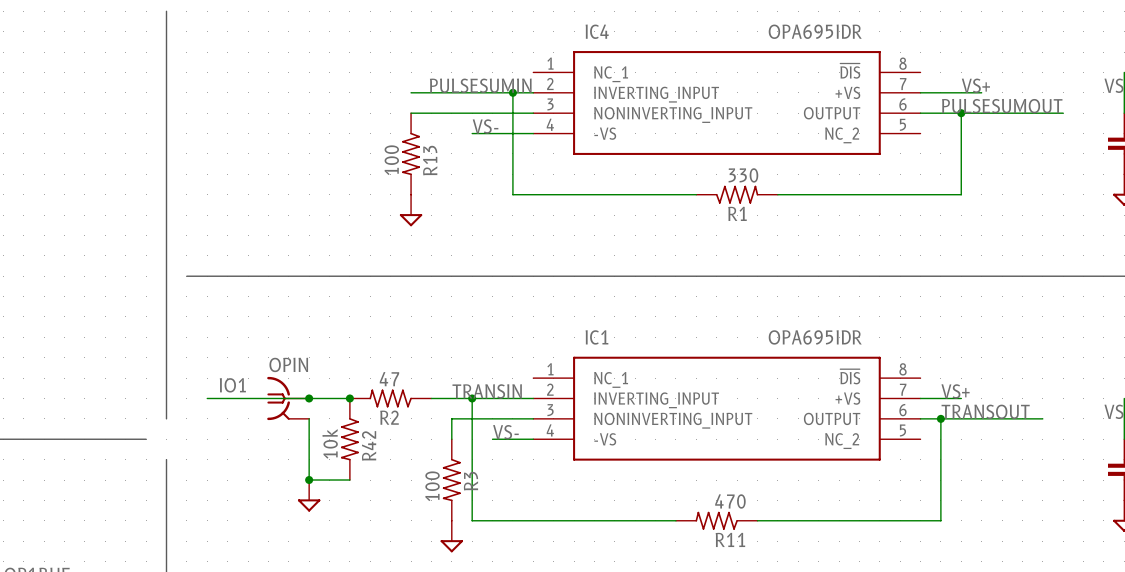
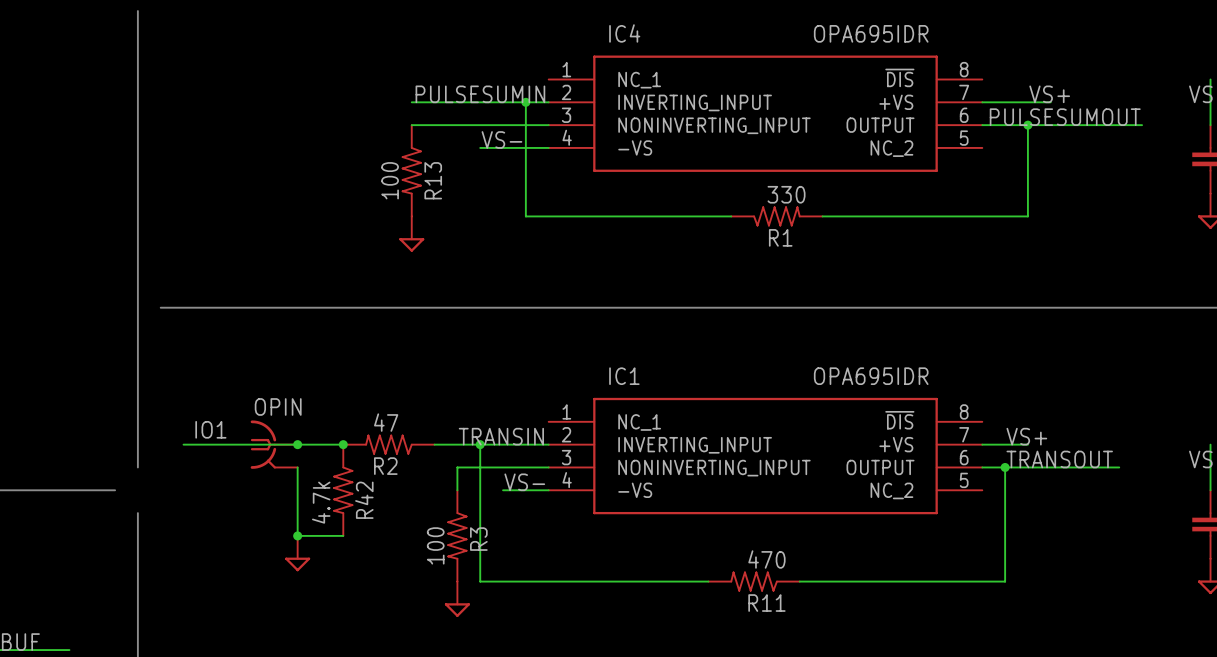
R42 value: 10k (330, 443) -> 4.7k (321, 502)

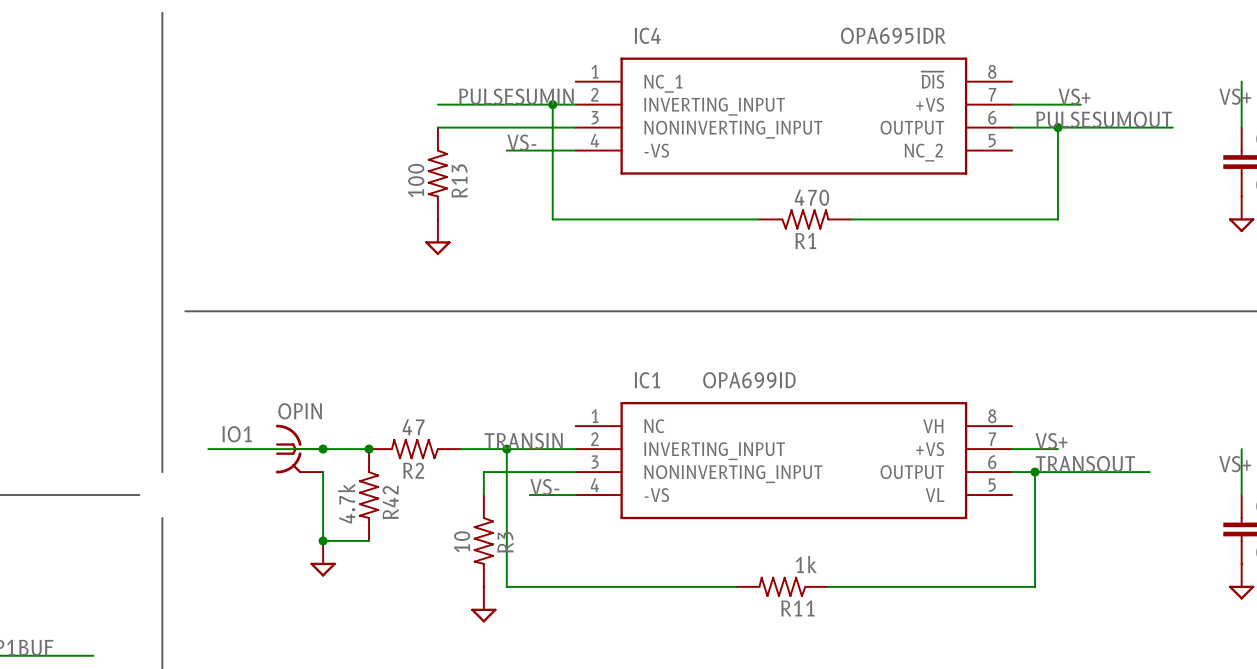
R1 value: 330 (786, 194) -> 470 (811, 197)
IC1 value: OPA695IDR (871, 376) -> OPA699ID (749, 380)
IC1 pin name: ~{DIS} (899, 420) -> VH (933, 426)
IC1 pin name: NC_1 (639, 422) -> NC (654, 426)
IC1 pin name: NC_2 (891, 490) -> VL (935, 495)
R3 value: 100 (435, 545) -> 10 (462, 541)
R11 value: 470 (766, 559) -> 1k (806, 564)

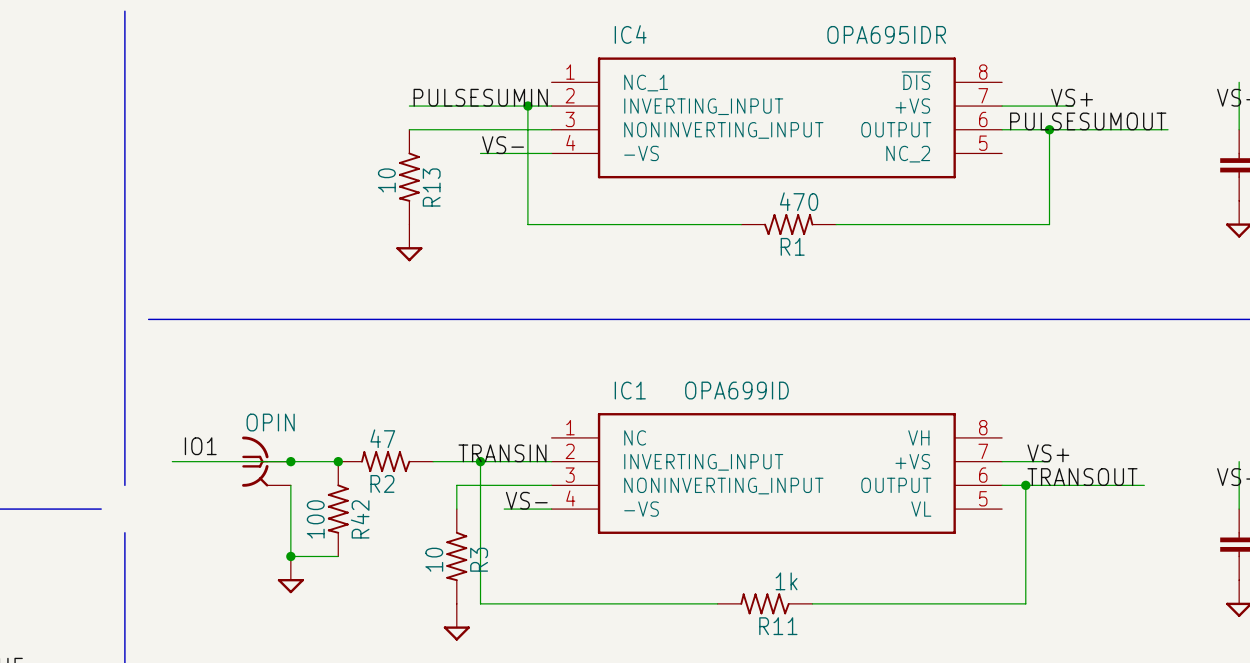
R13 value: 100 (416, 180) -> 10 (386, 180)
R42 value: 4.7k (346, 503) -> 100 (315, 519)

